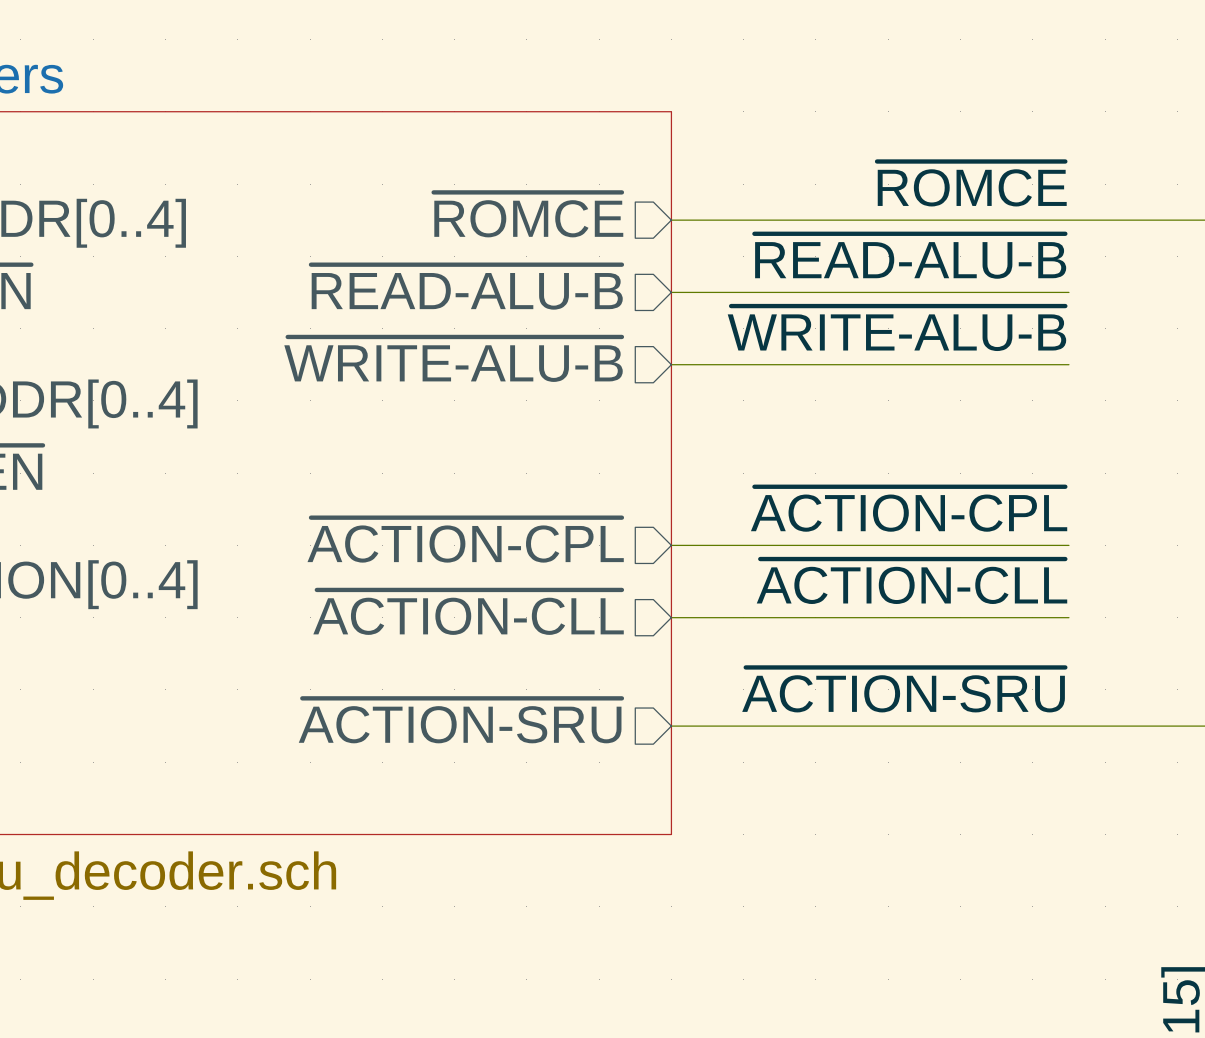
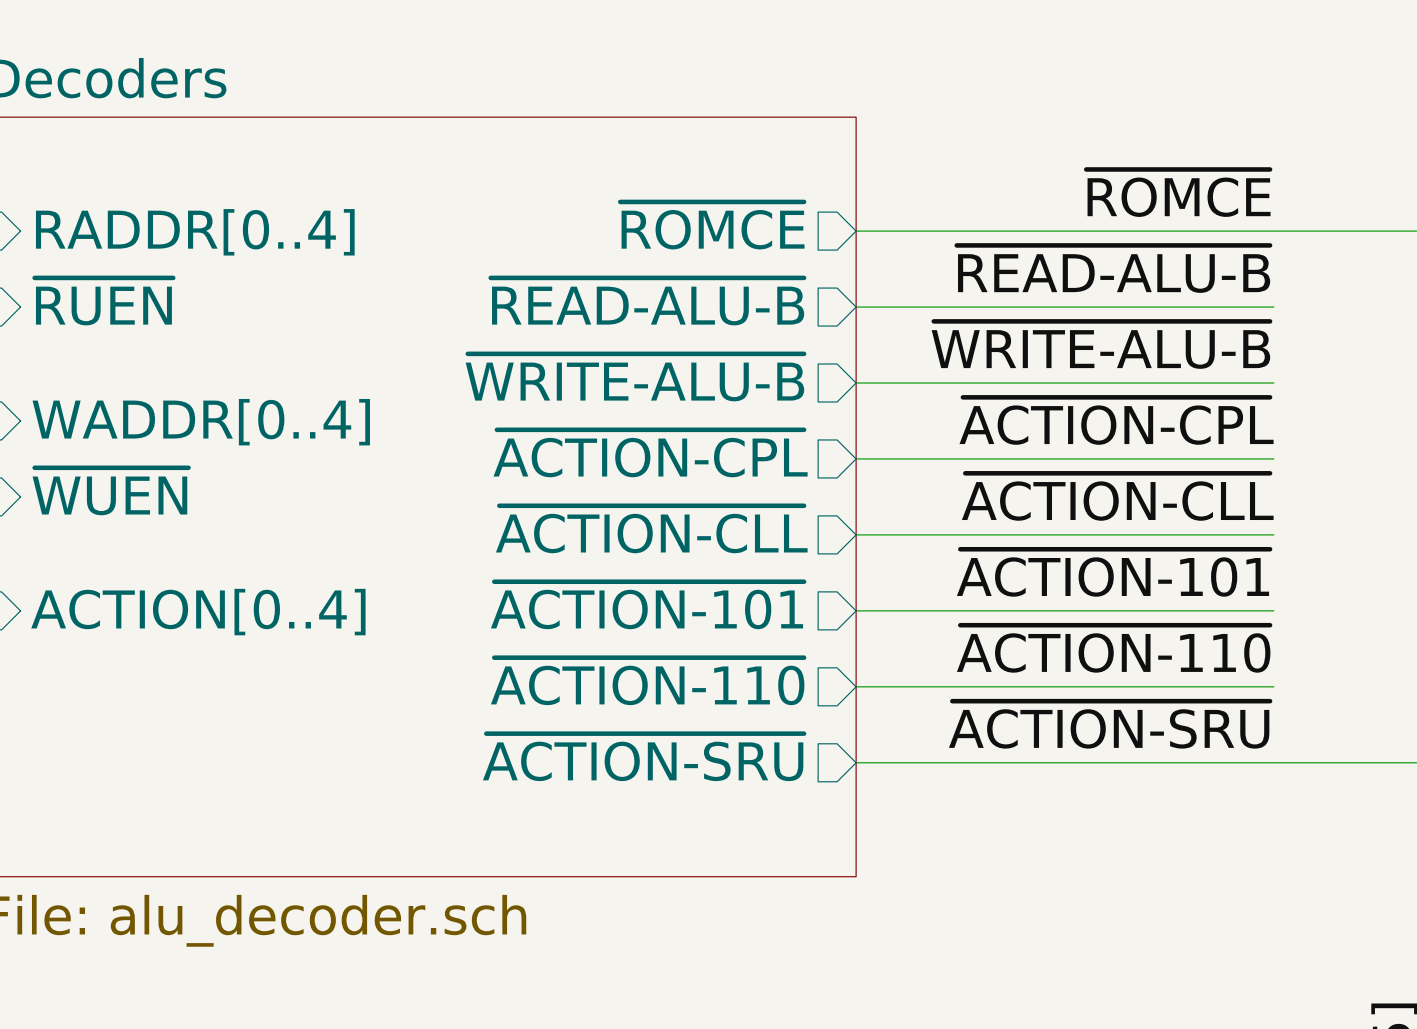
wire: none -> (856, 458) (1273, 458)
label position: ~{ACTION-CPL} (909, 509) -> ~{ACTION-CPL} (1116, 421)
sheet pin position: ~{ACTION-CPL} (465, 540) -> ~{ACTION-CPL} (650, 453)
wire: (671, 545) (1068, 545) -> (856, 534) (1273, 534)
label: none -> ~{ACTION-101} (1113, 572)
sheet pin: none -> ~{ACTION-101} (647, 605)
label position: ~{ACTION-CLL} (911, 581) -> ~{ACTION-CLL} (1117, 497)
sheet pin position: ~{ACTION-CLL} (468, 612) -> ~{ACTION-CLL} (651, 529)
wire: (671, 617) (1068, 617) -> (856, 610) (1273, 610)
label: none -> ~{ACTION-110} (1113, 648)
sheet pin: none -> ~{ACTION-110} (647, 681)
wire: none -> (856, 686) (1273, 686)

